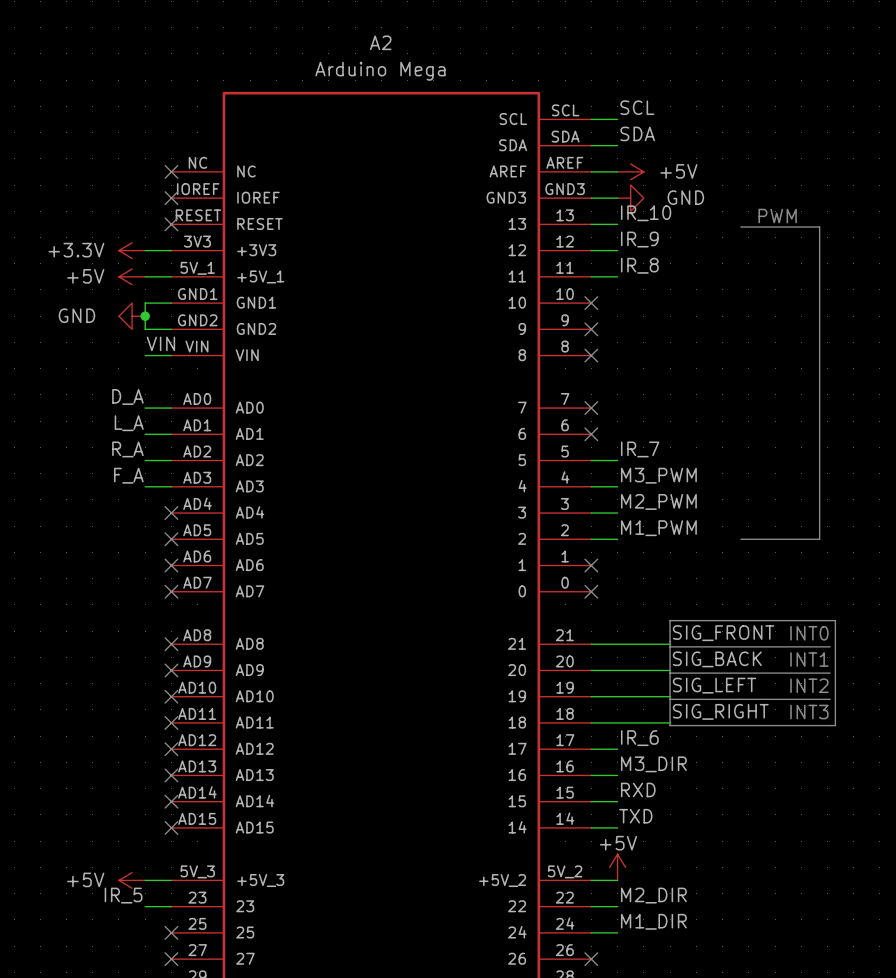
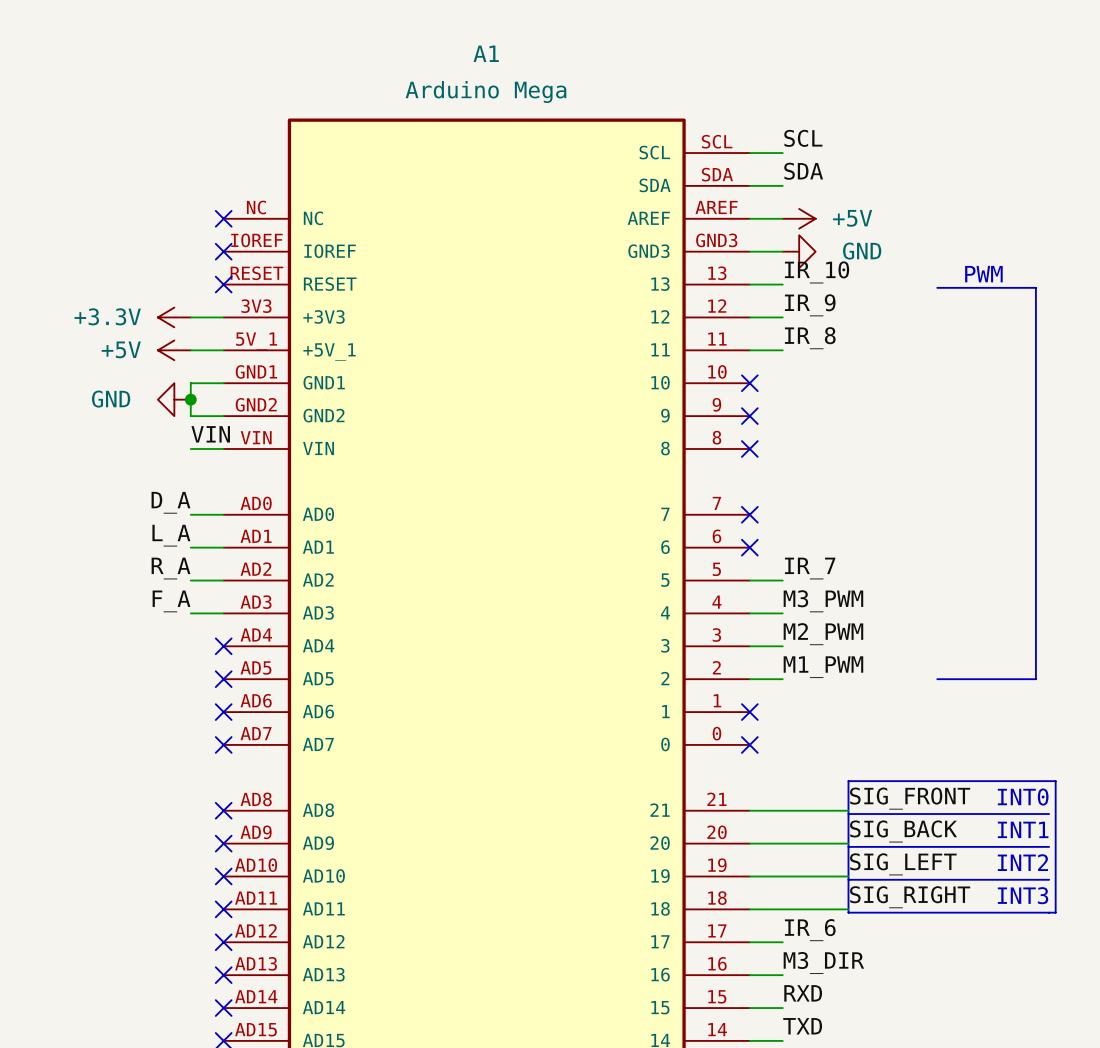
A2 name: A2 (380, 42) -> A1 (486, 53)

